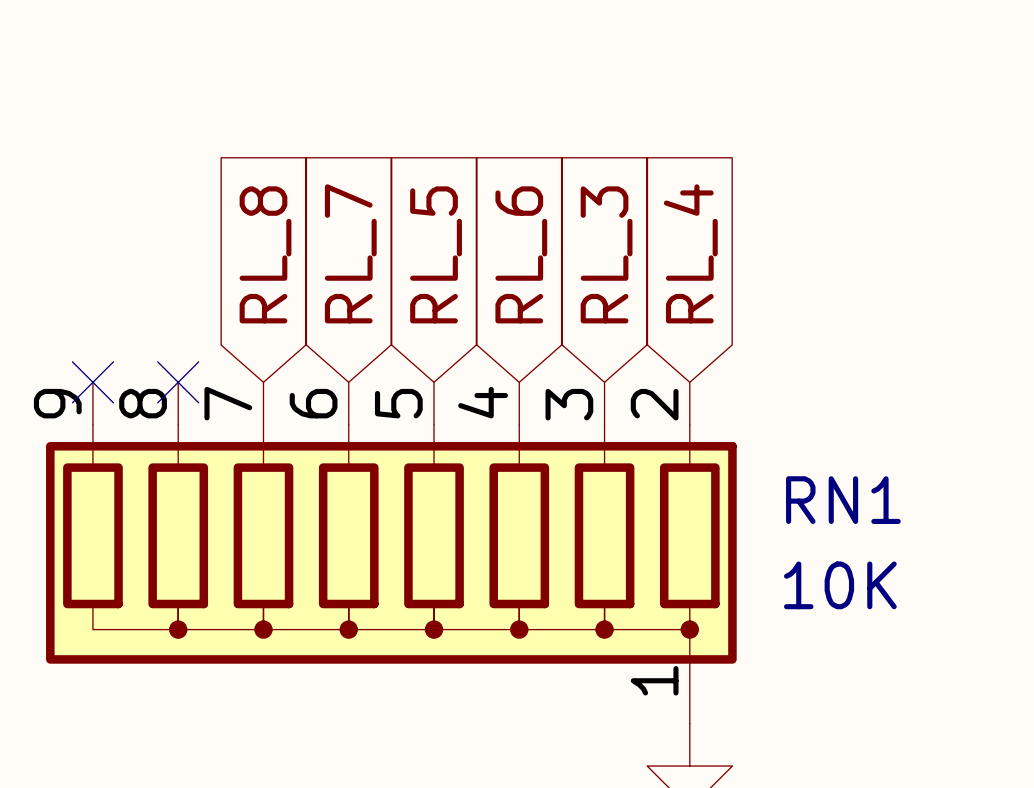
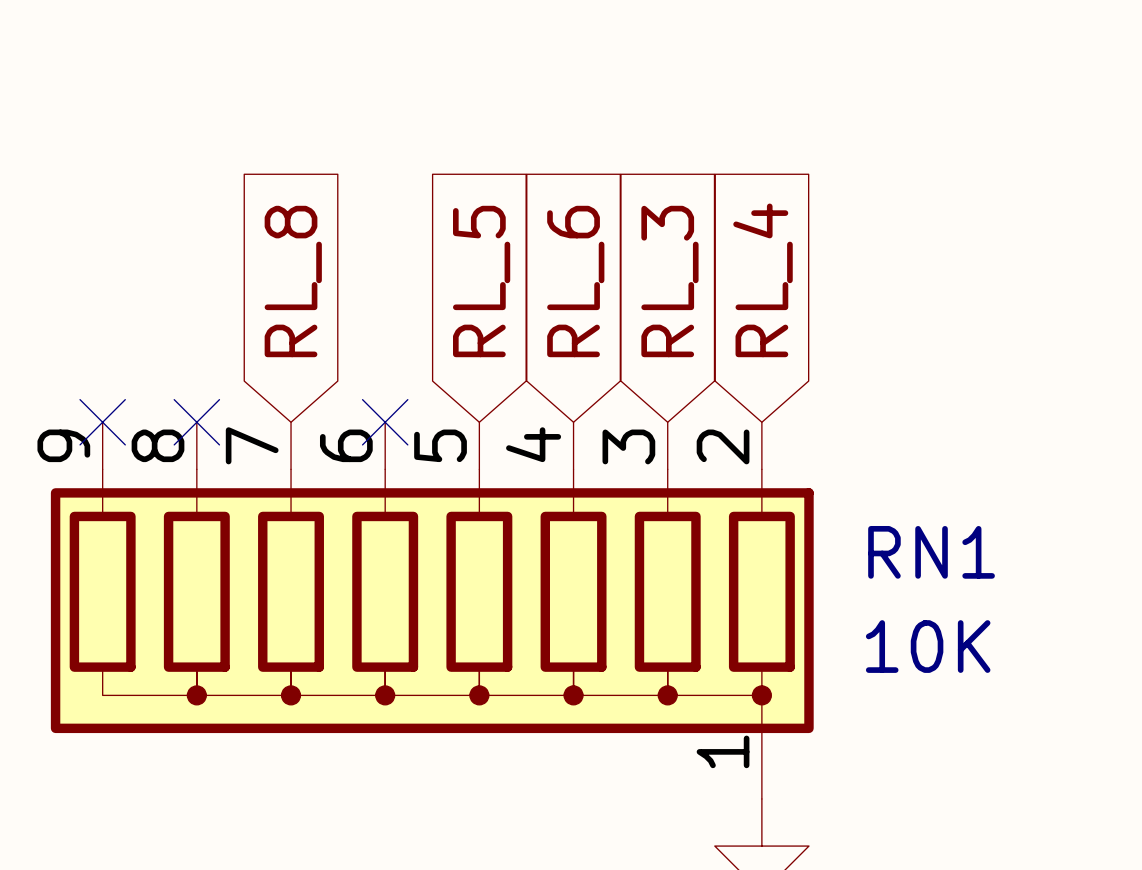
global label: RL_7 (350, 253) -> none
no-connect mark: none -> (385, 422)

